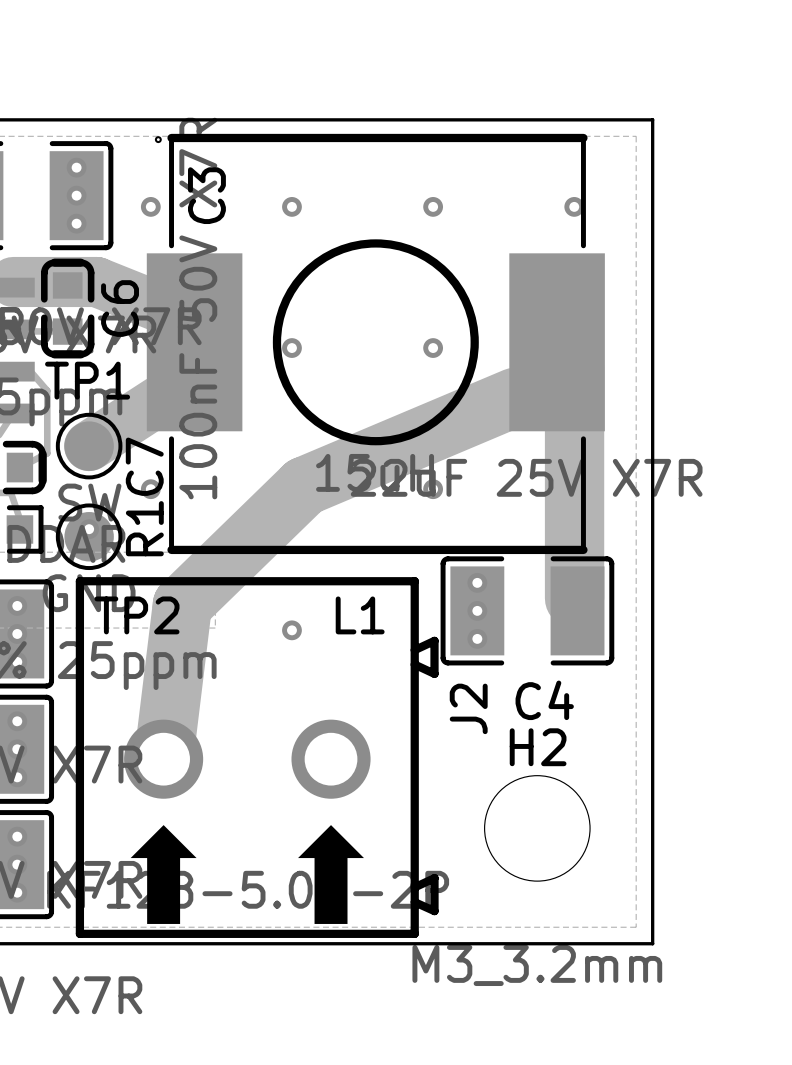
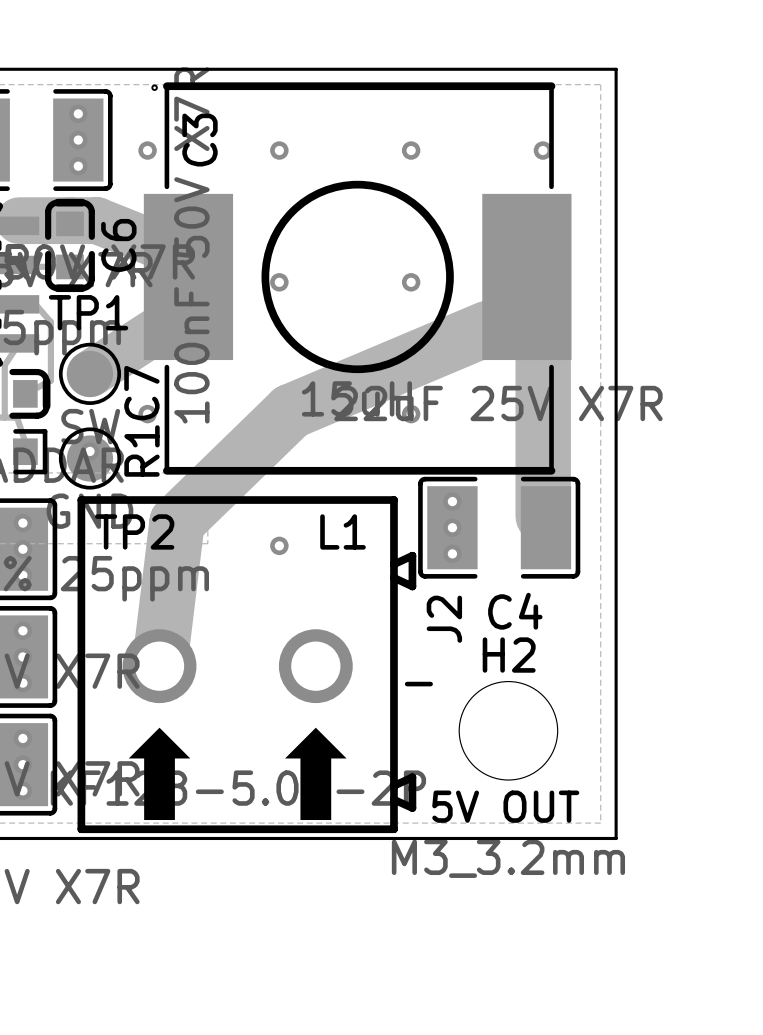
text: none -> - (418, 684)
text: none -> 5V OUT (505, 806)

